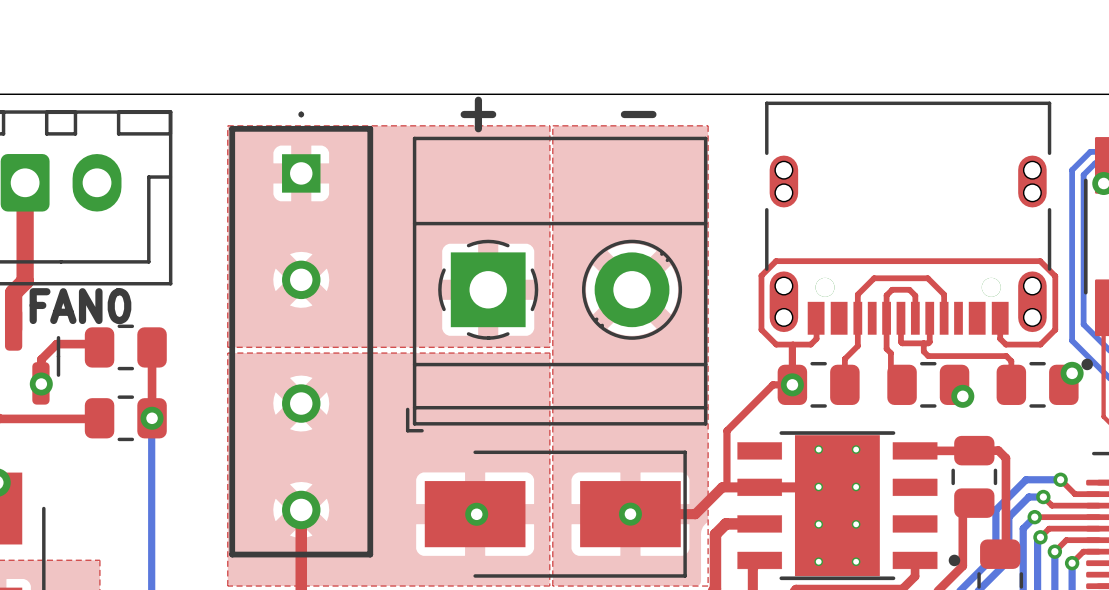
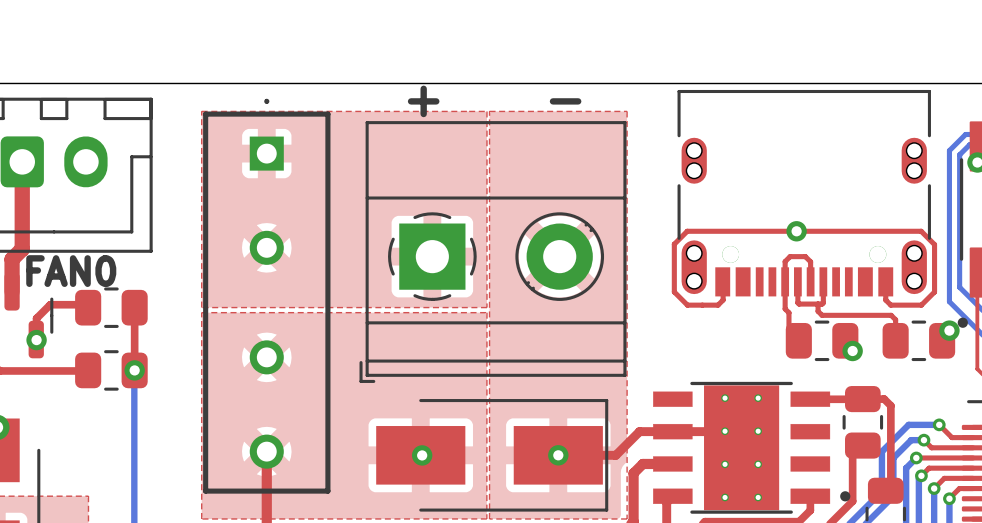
top track: (944, 318) (944, 294) (927, 278) (874, 278) (857, 294) (857, 346) (844, 358) (844, 384) -> none
top track: (793, 344) (792, 384) (772, 384) (726, 430) (726, 488) -> none
via position: (792, 384) -> (796, 231)
part: (818, 384) -> none

